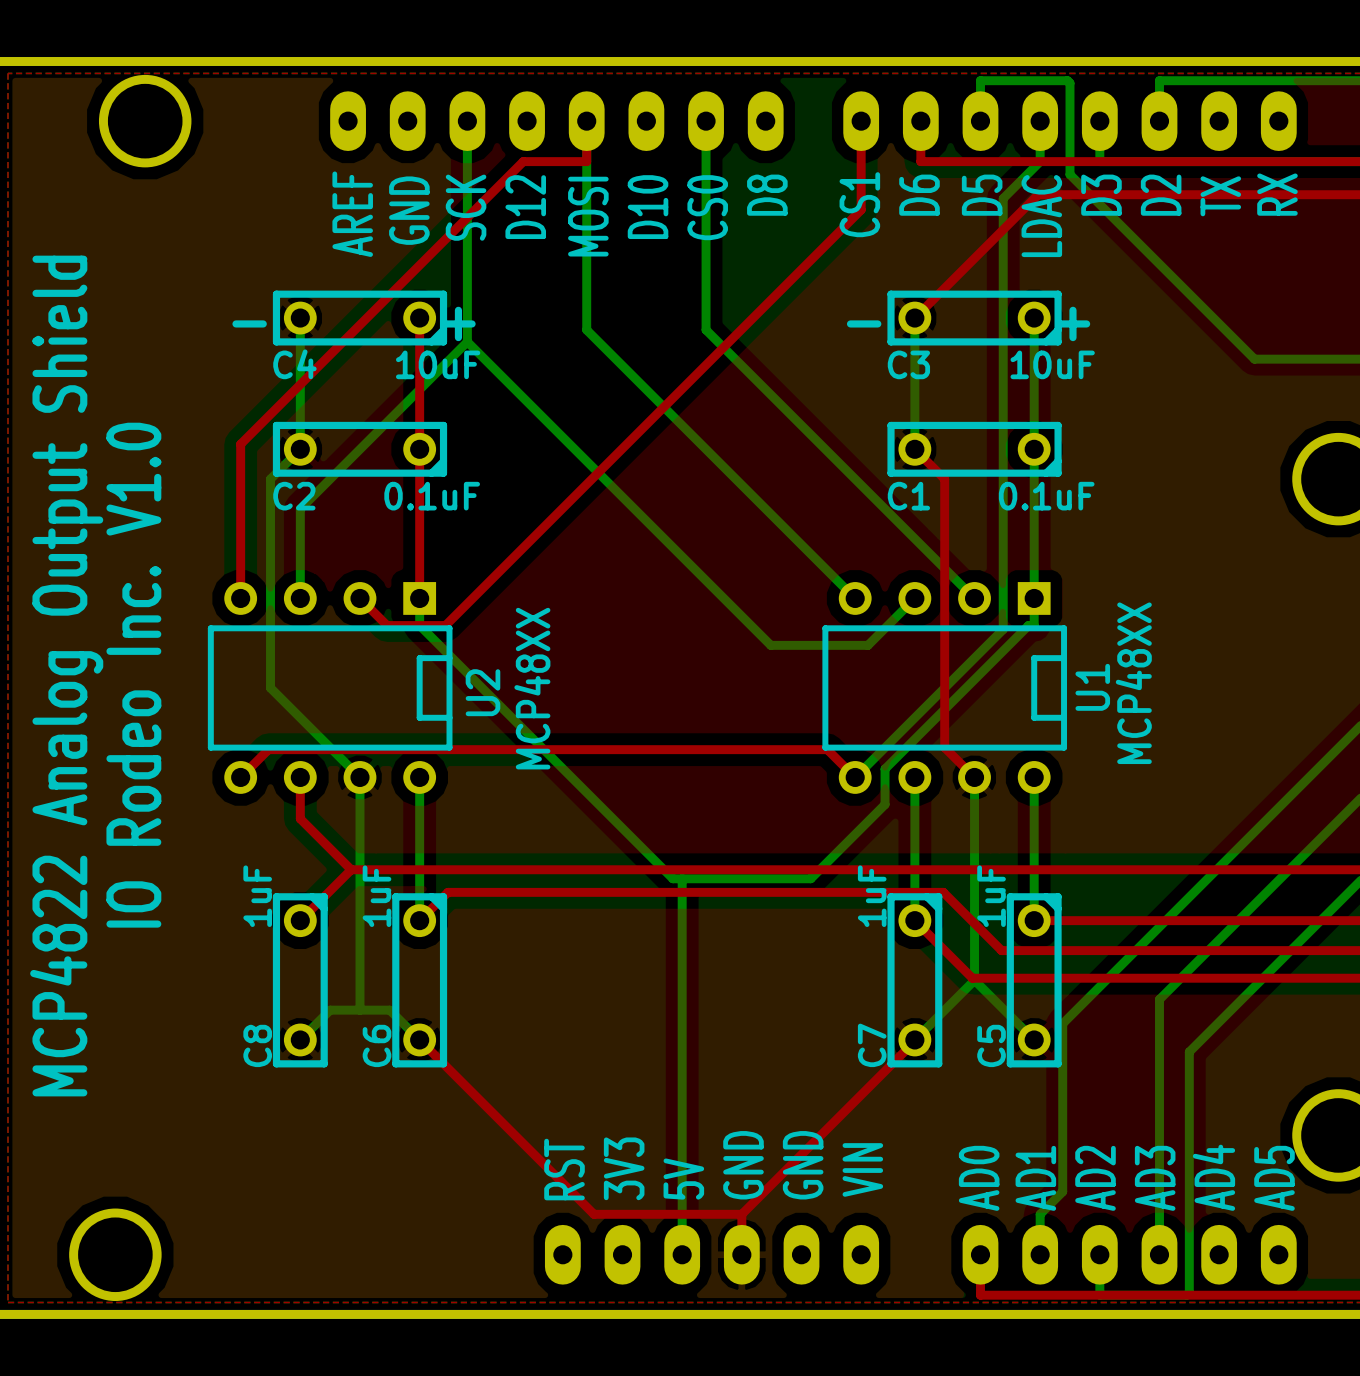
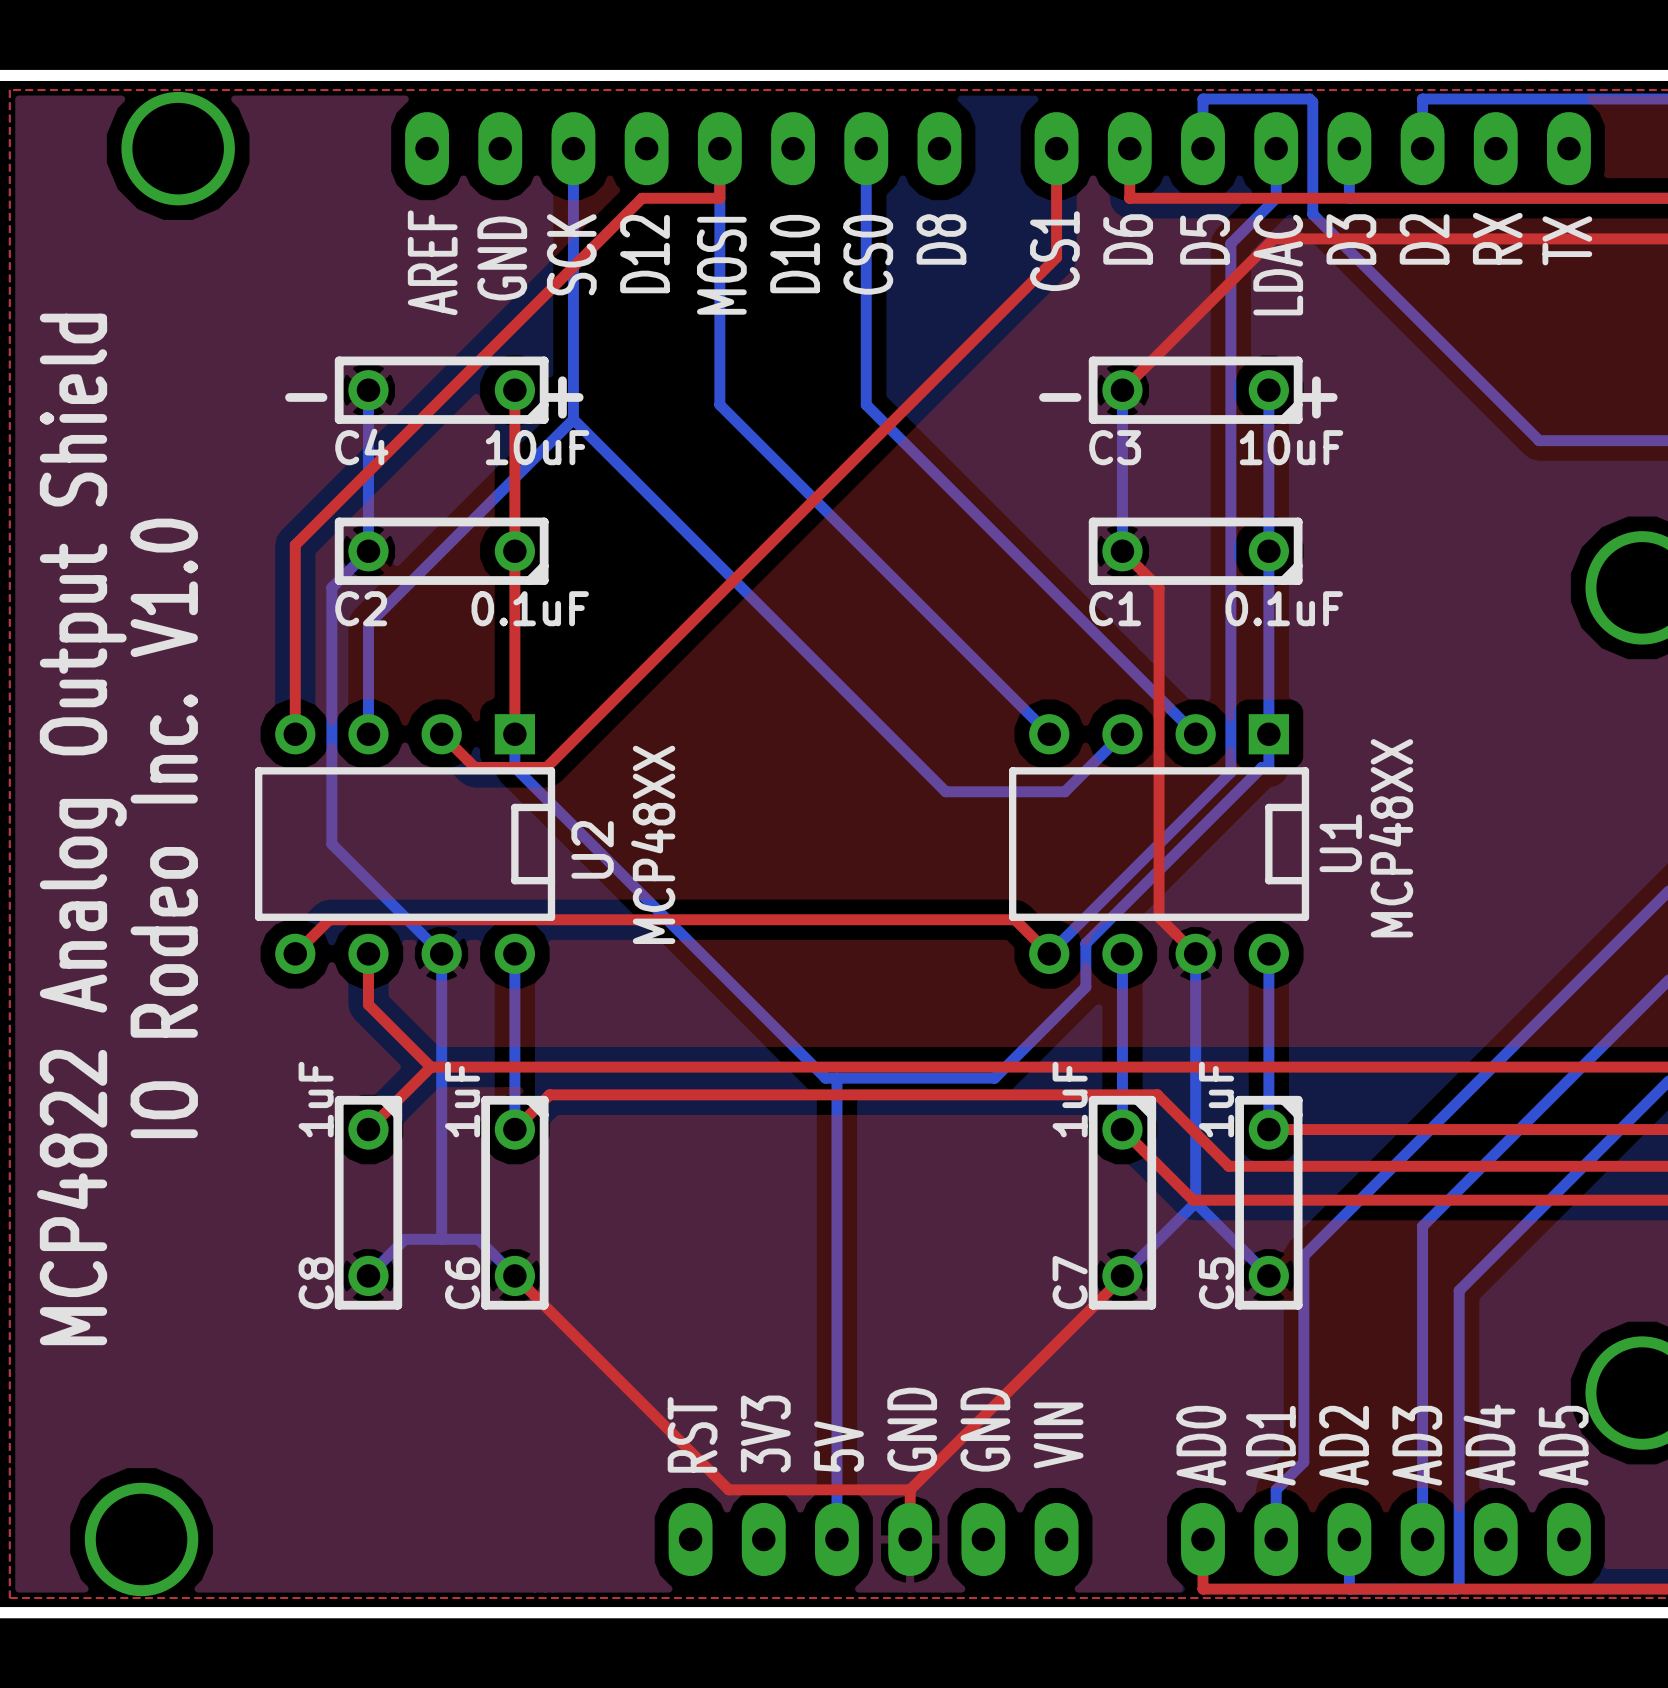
text: RX (1277, 194) -> TX (1567, 240)
text: TX (1220, 196) -> RX (1497, 238)

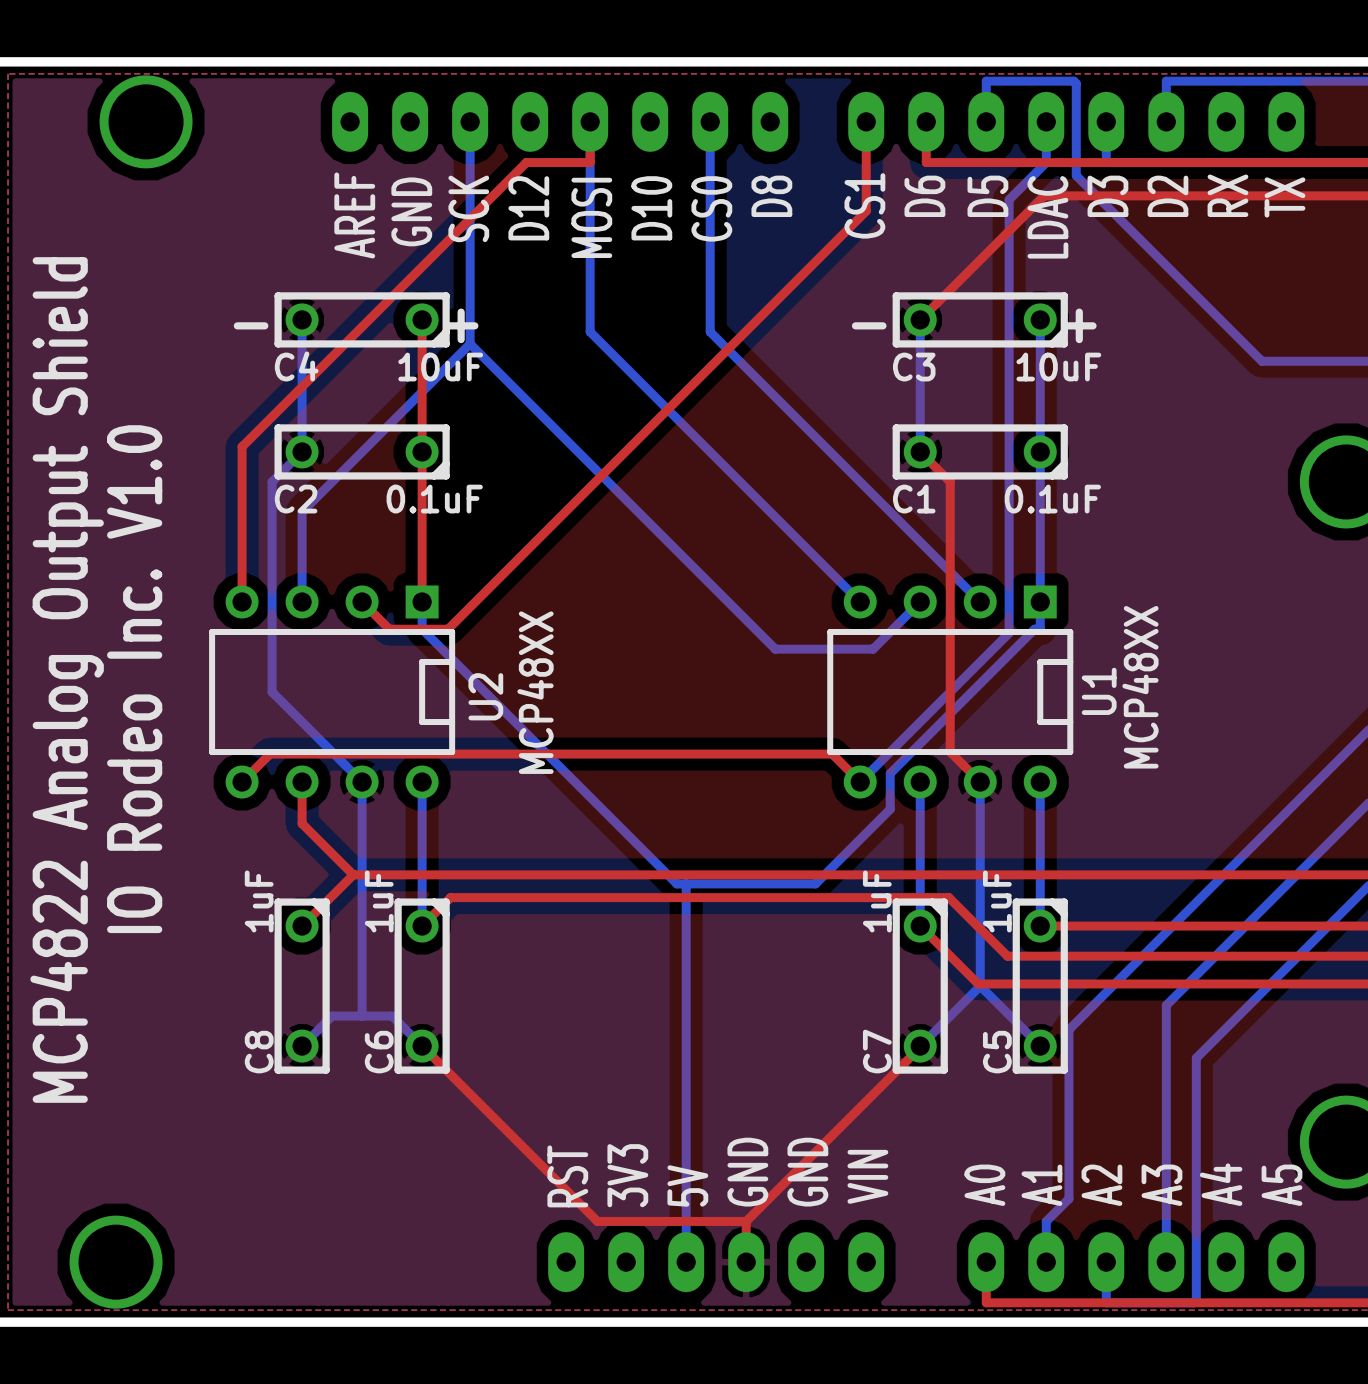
text: AD0 (1201, 1445) -> A0 (984, 1185)
text: AD1 (1270, 1445) -> A1 (1041, 1185)
text: AD2 (1344, 1445) -> A2 (1101, 1185)
text: AD3 (1417, 1445) -> A3 (1161, 1185)
text: AD4 (1489, 1445) -> A4 (1221, 1184)
text: AD5 (1563, 1445) -> A5 (1281, 1185)

